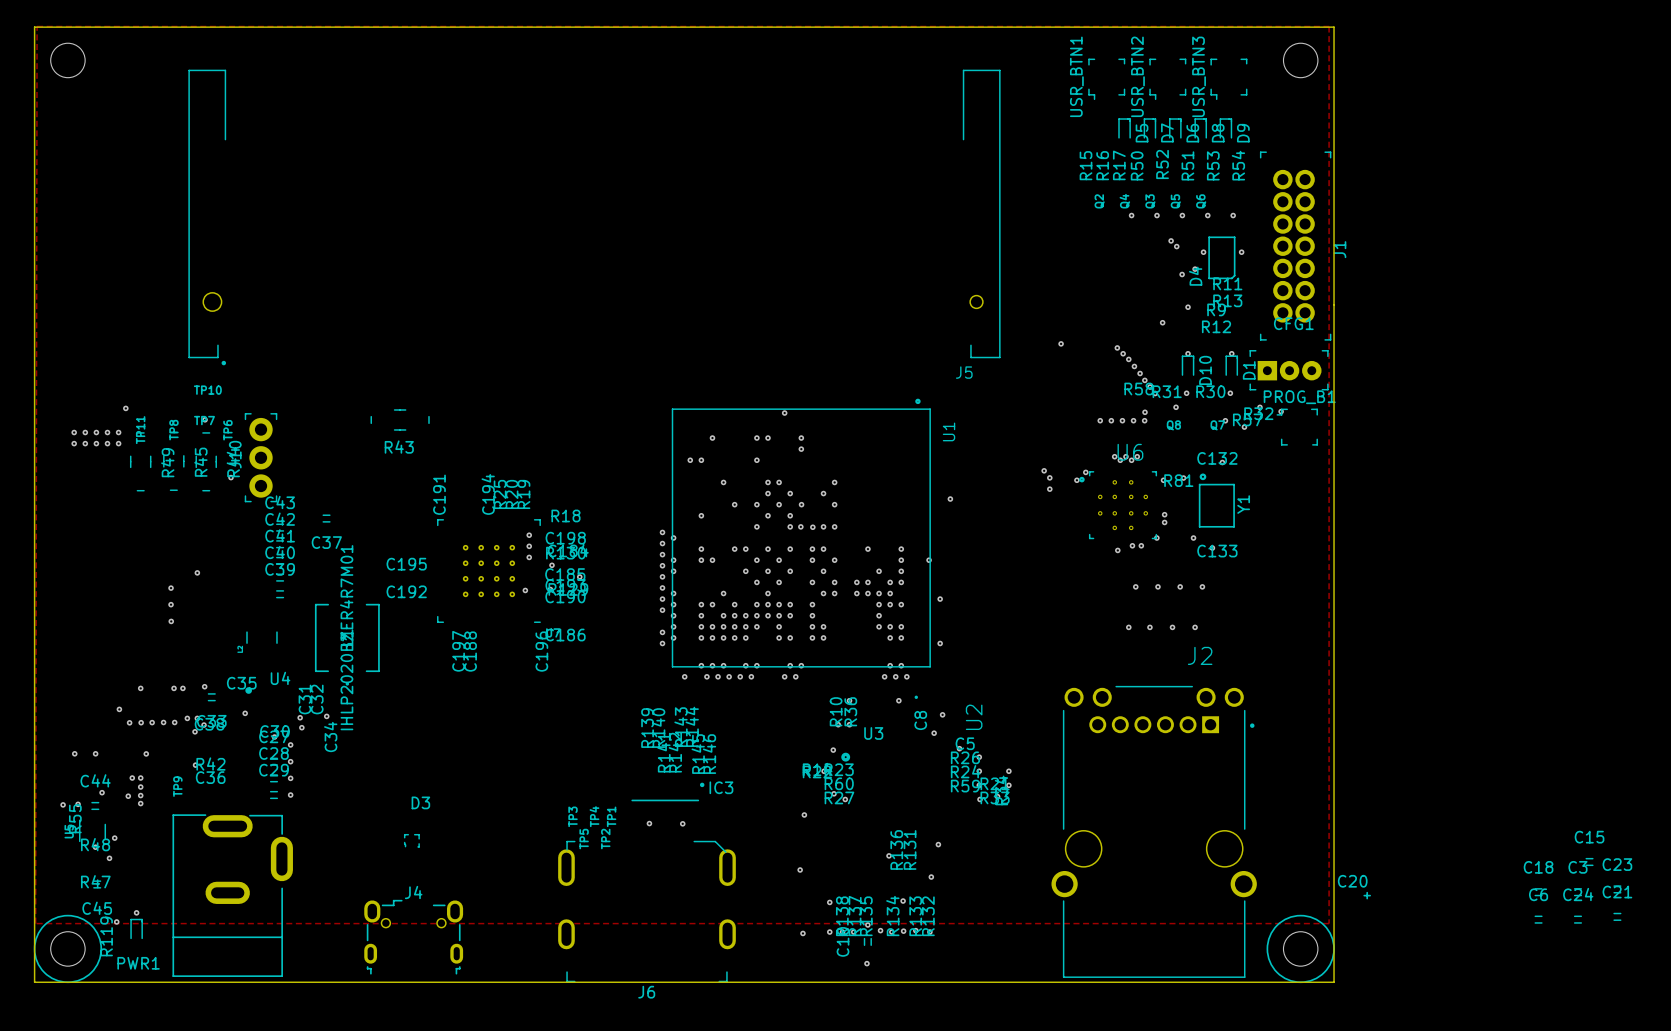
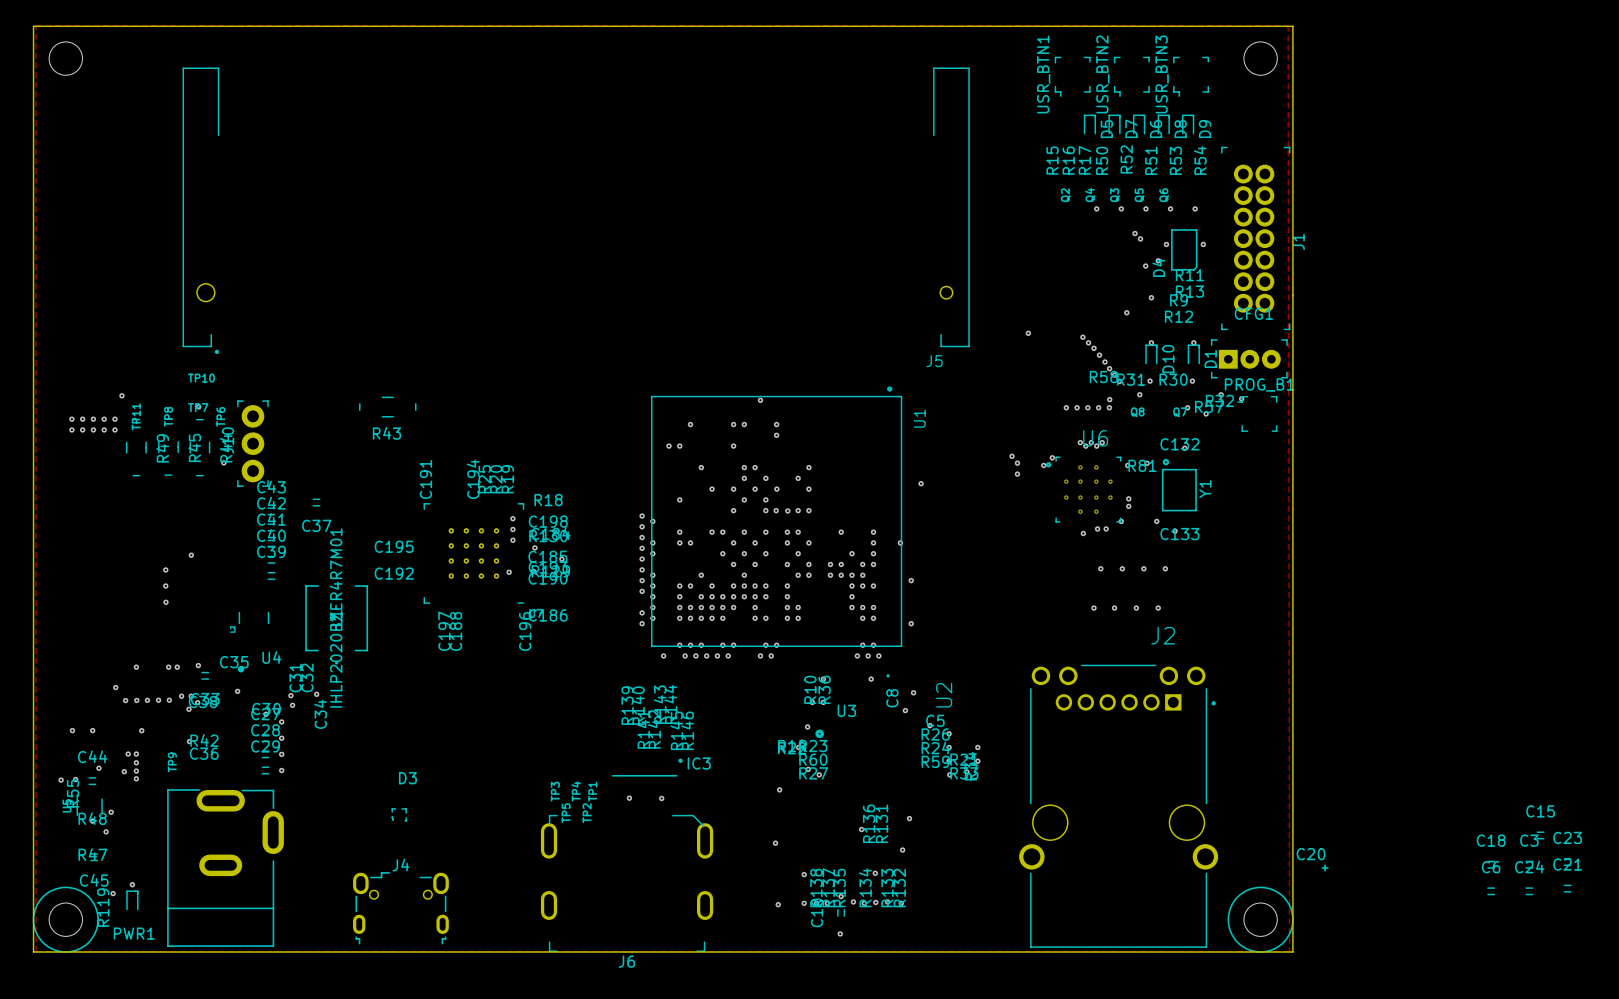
zone outline: (37, 26) (35, 923) (1329, 923) (1329, 26) -> (35, 25) (36, 951) (1289, 951) (1288, 25)

